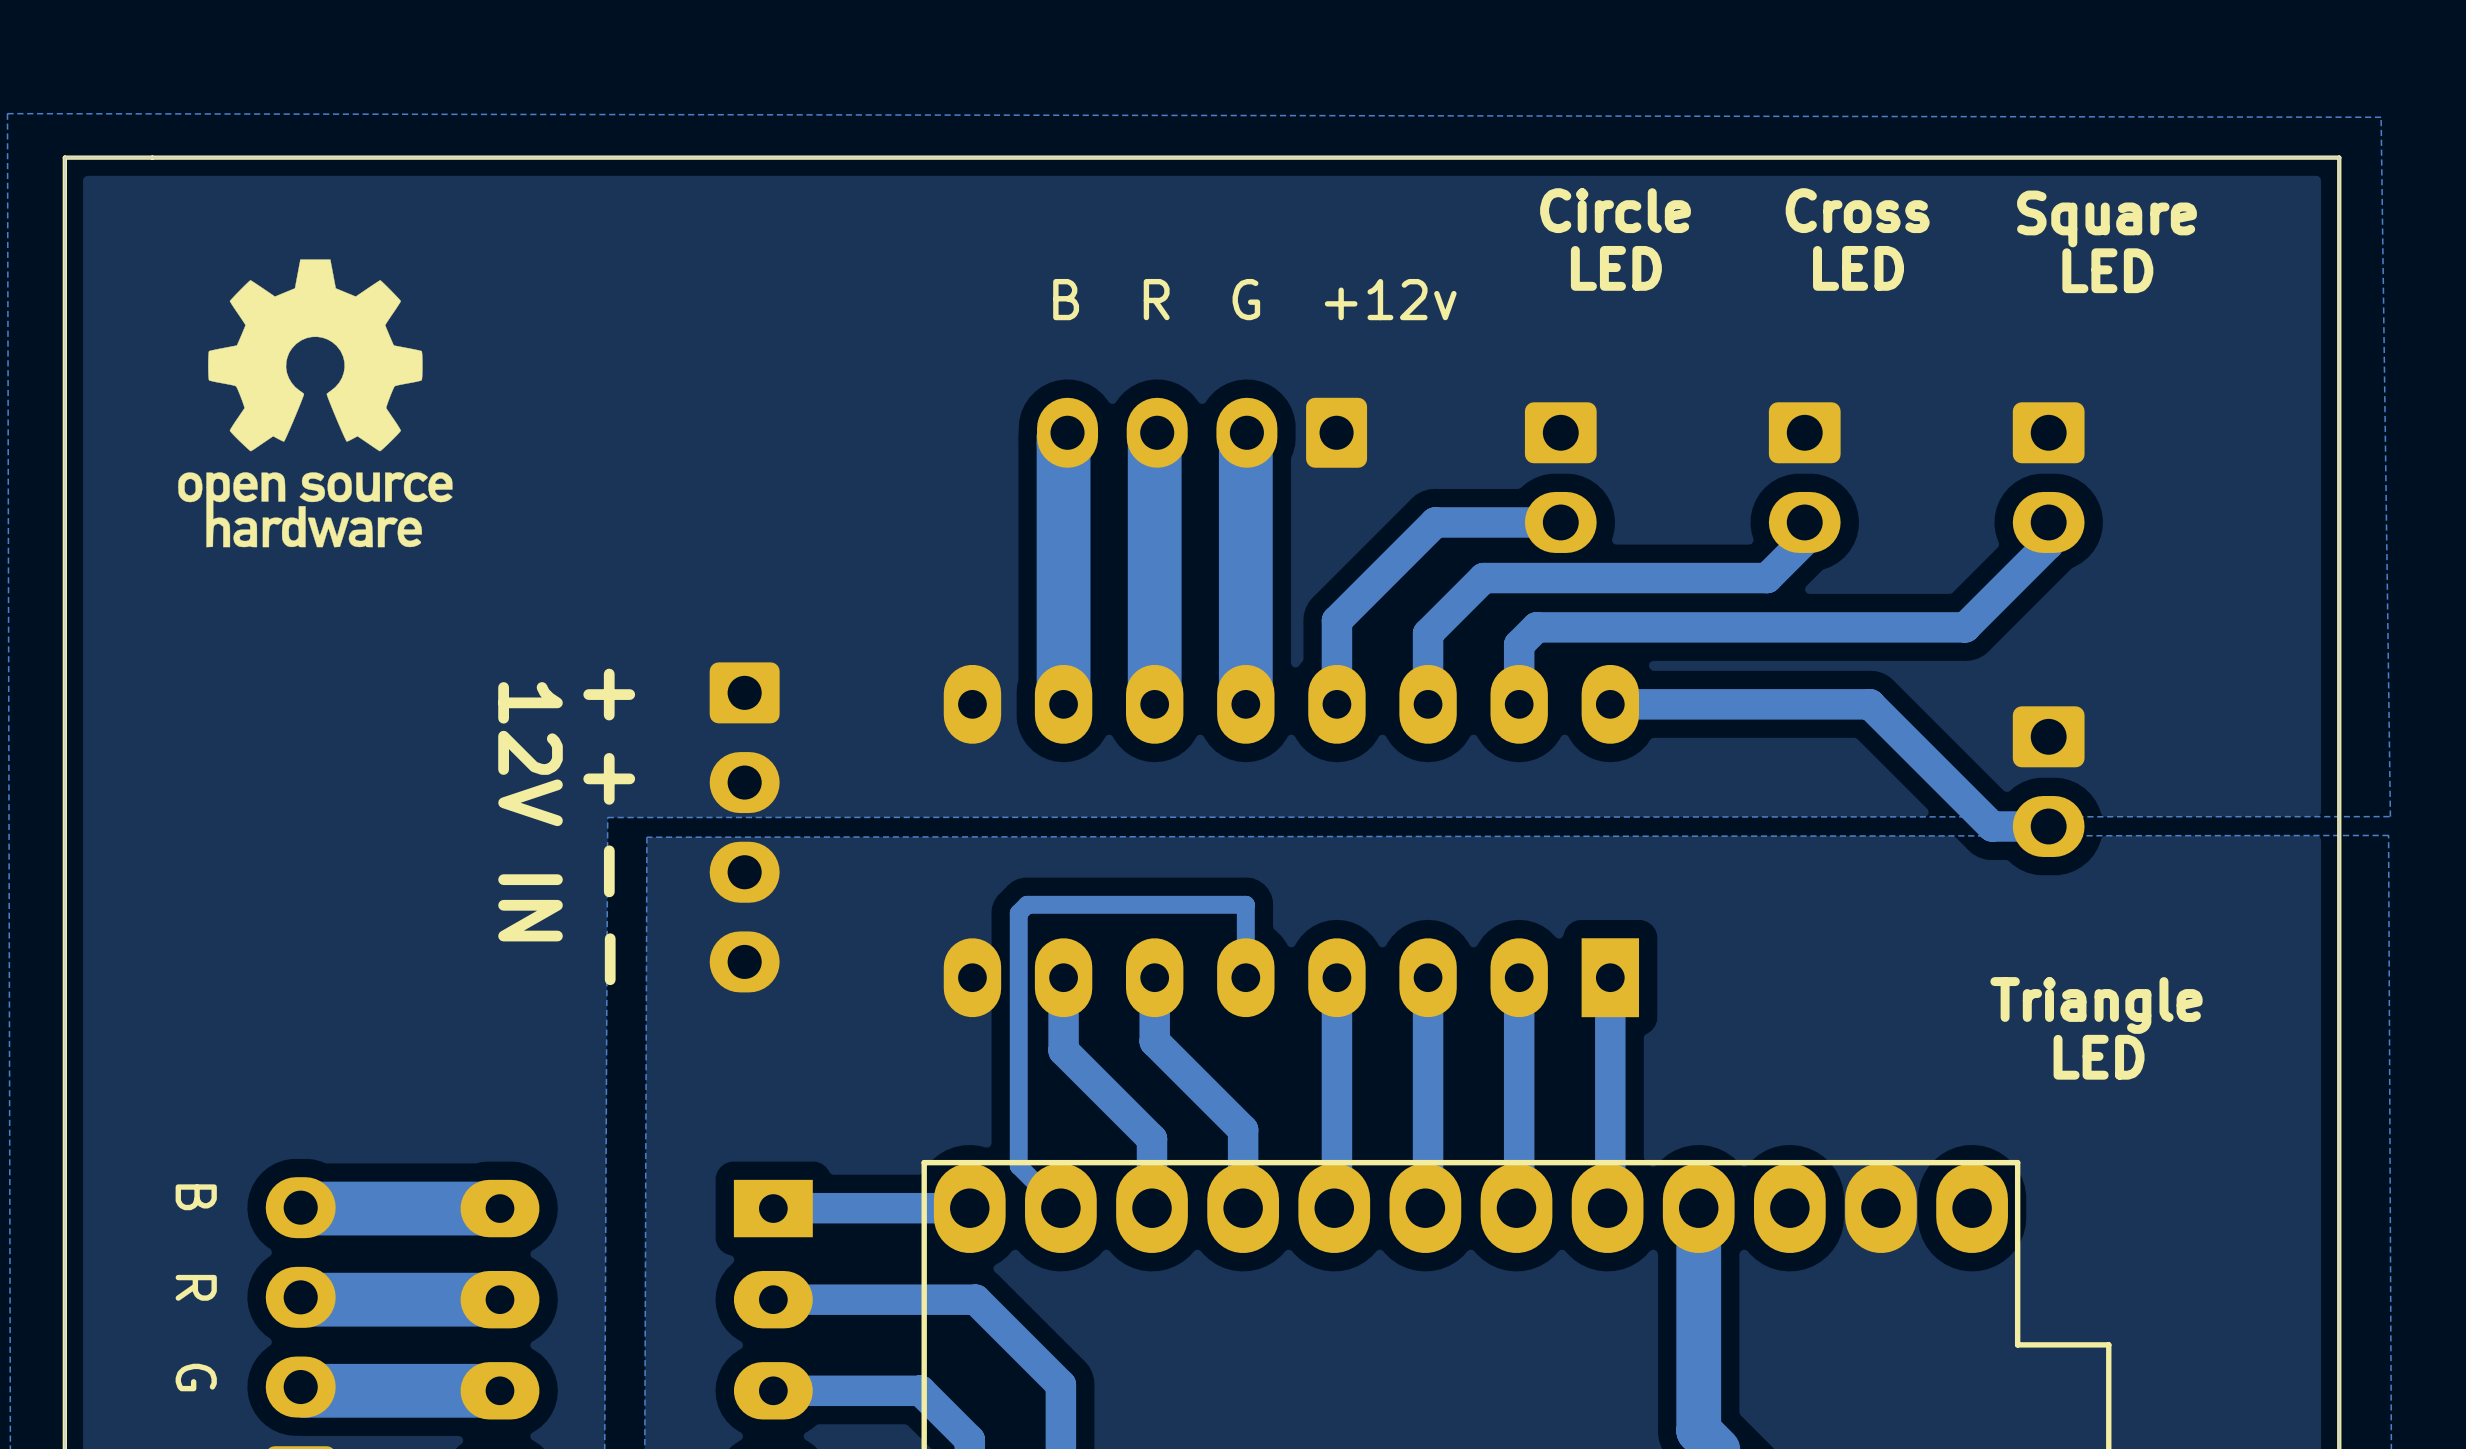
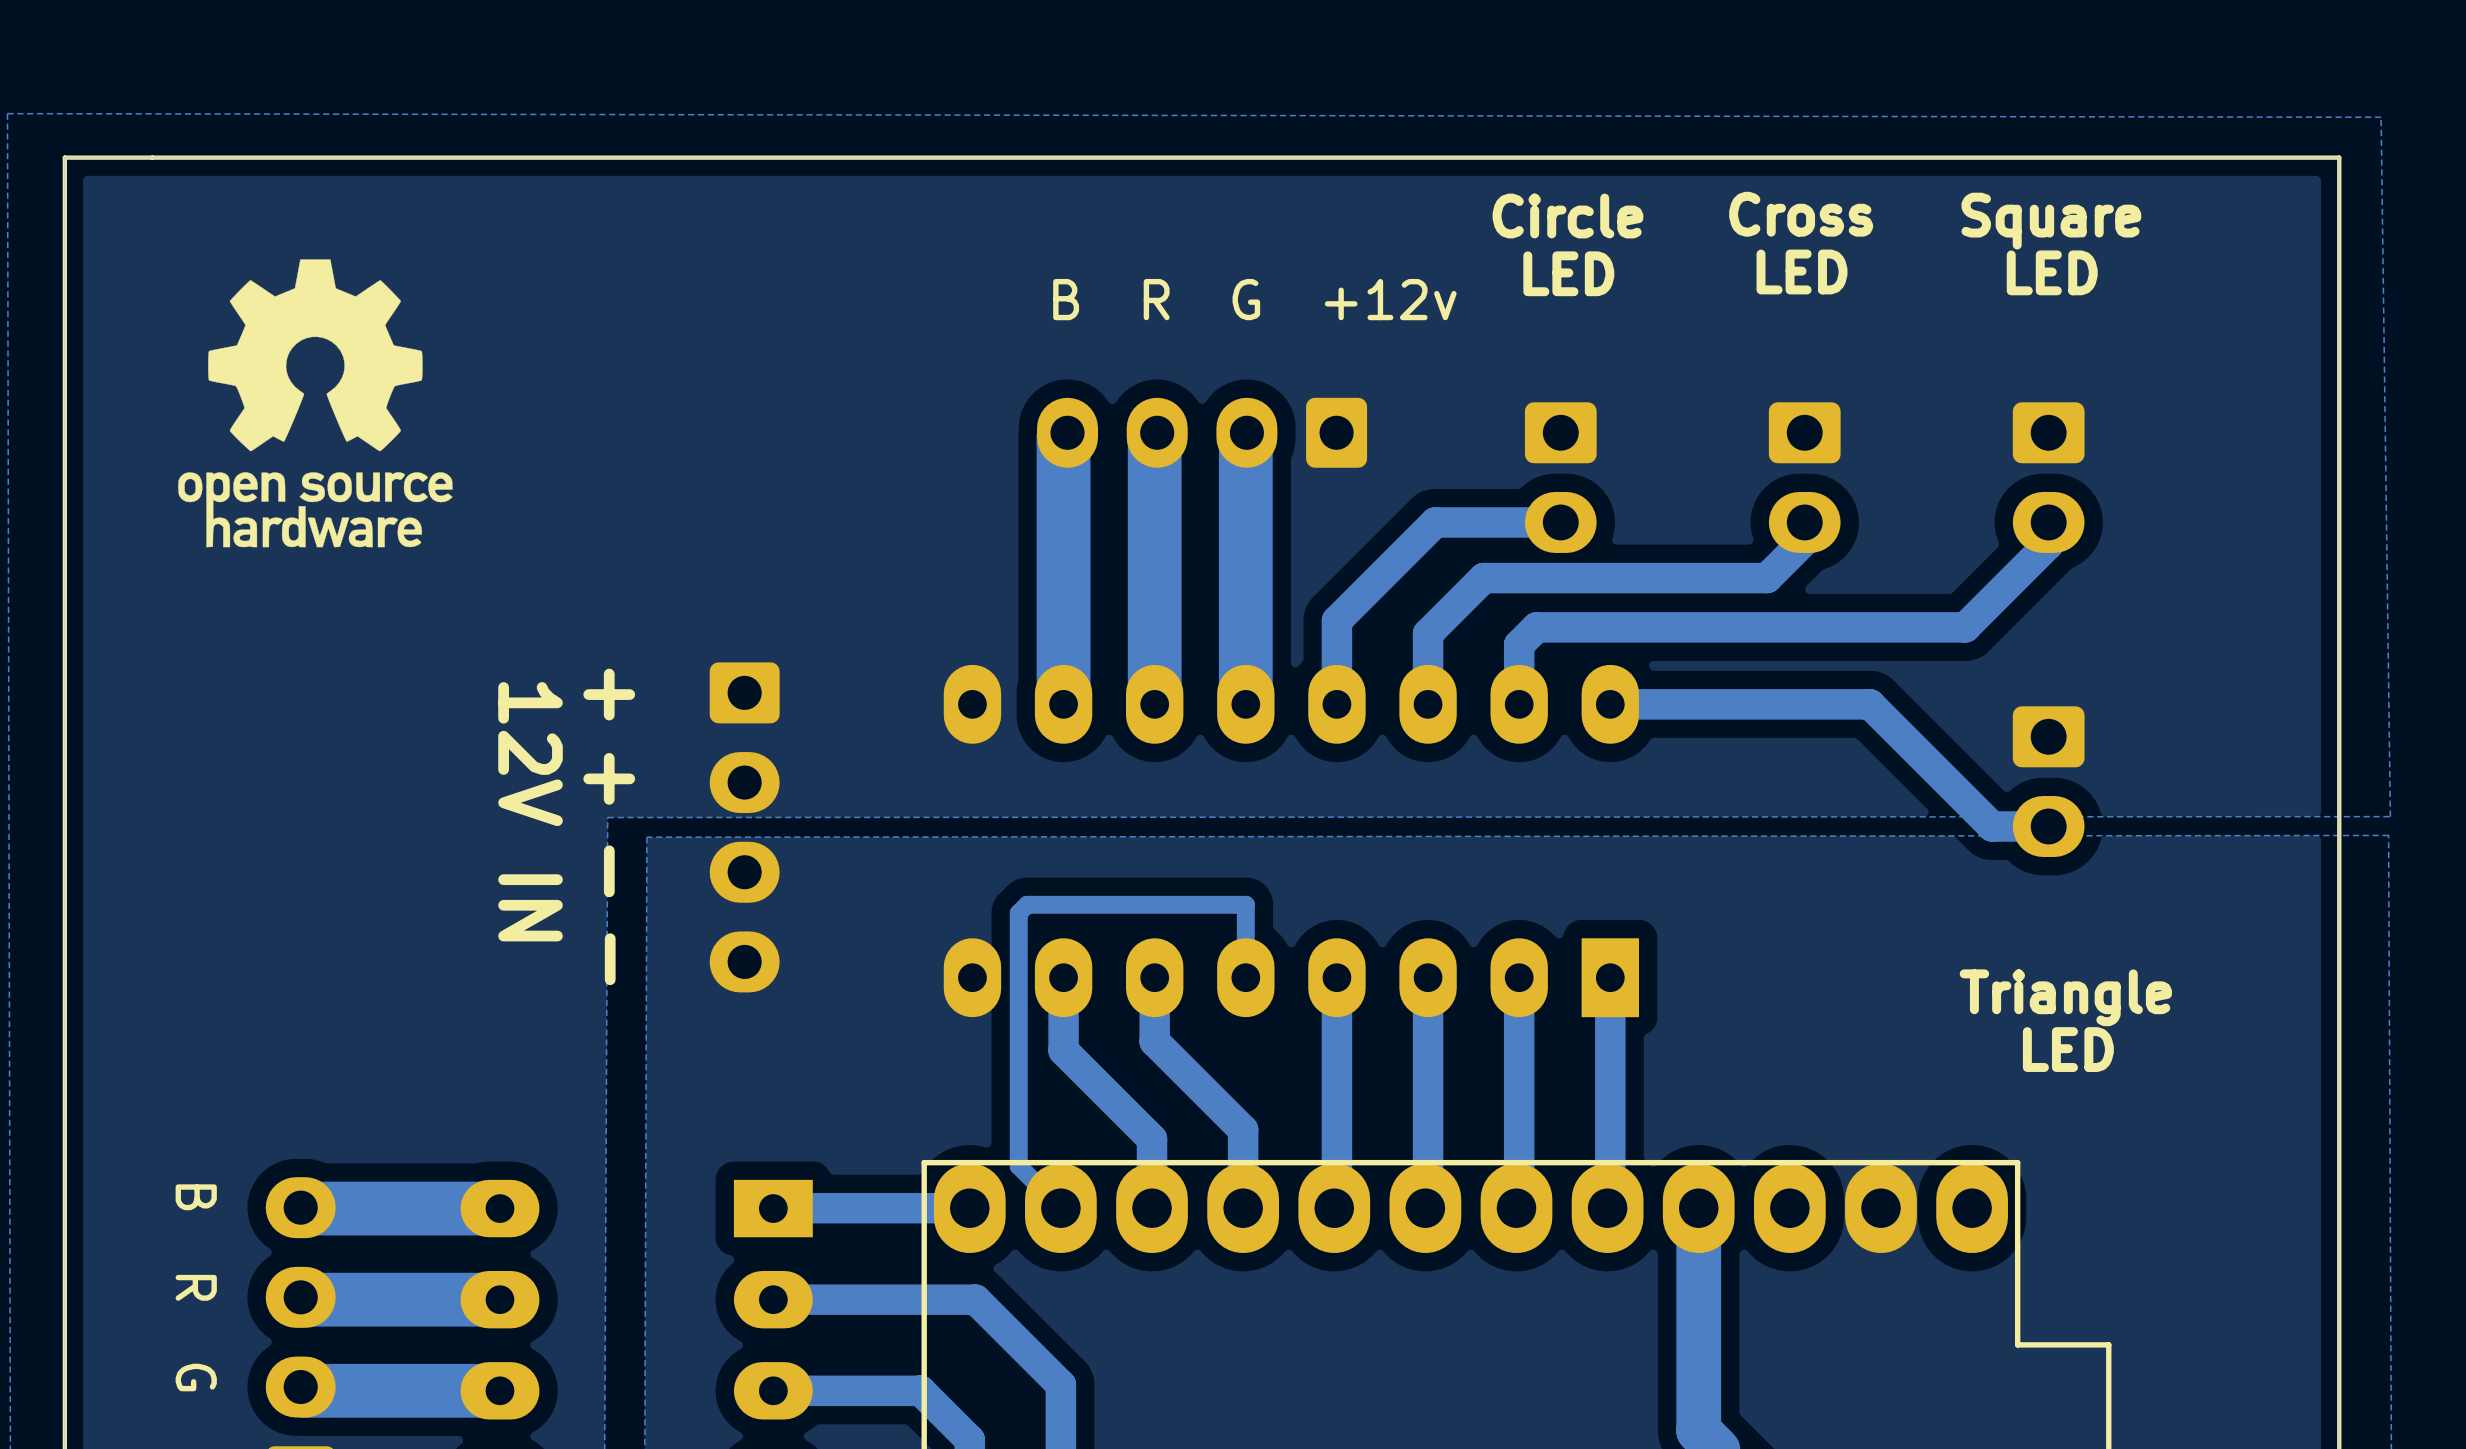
text position: Circle (1615, 210) -> Circle (1567, 216)
text position: Cross (1857, 210) -> Cross (1801, 214)
text position: Square (2106, 218) -> Square (2051, 221)
text position: LED (1616, 268) -> LED (1568, 273)
text position: LED (1858, 268) -> LED (1802, 271)
text position: LED (2107, 270) -> LED (2052, 272)
text position: Triangle (2096, 1005) -> Triangle (2065, 997)
text position: LED (2099, 1057) -> LED (2068, 1049)

